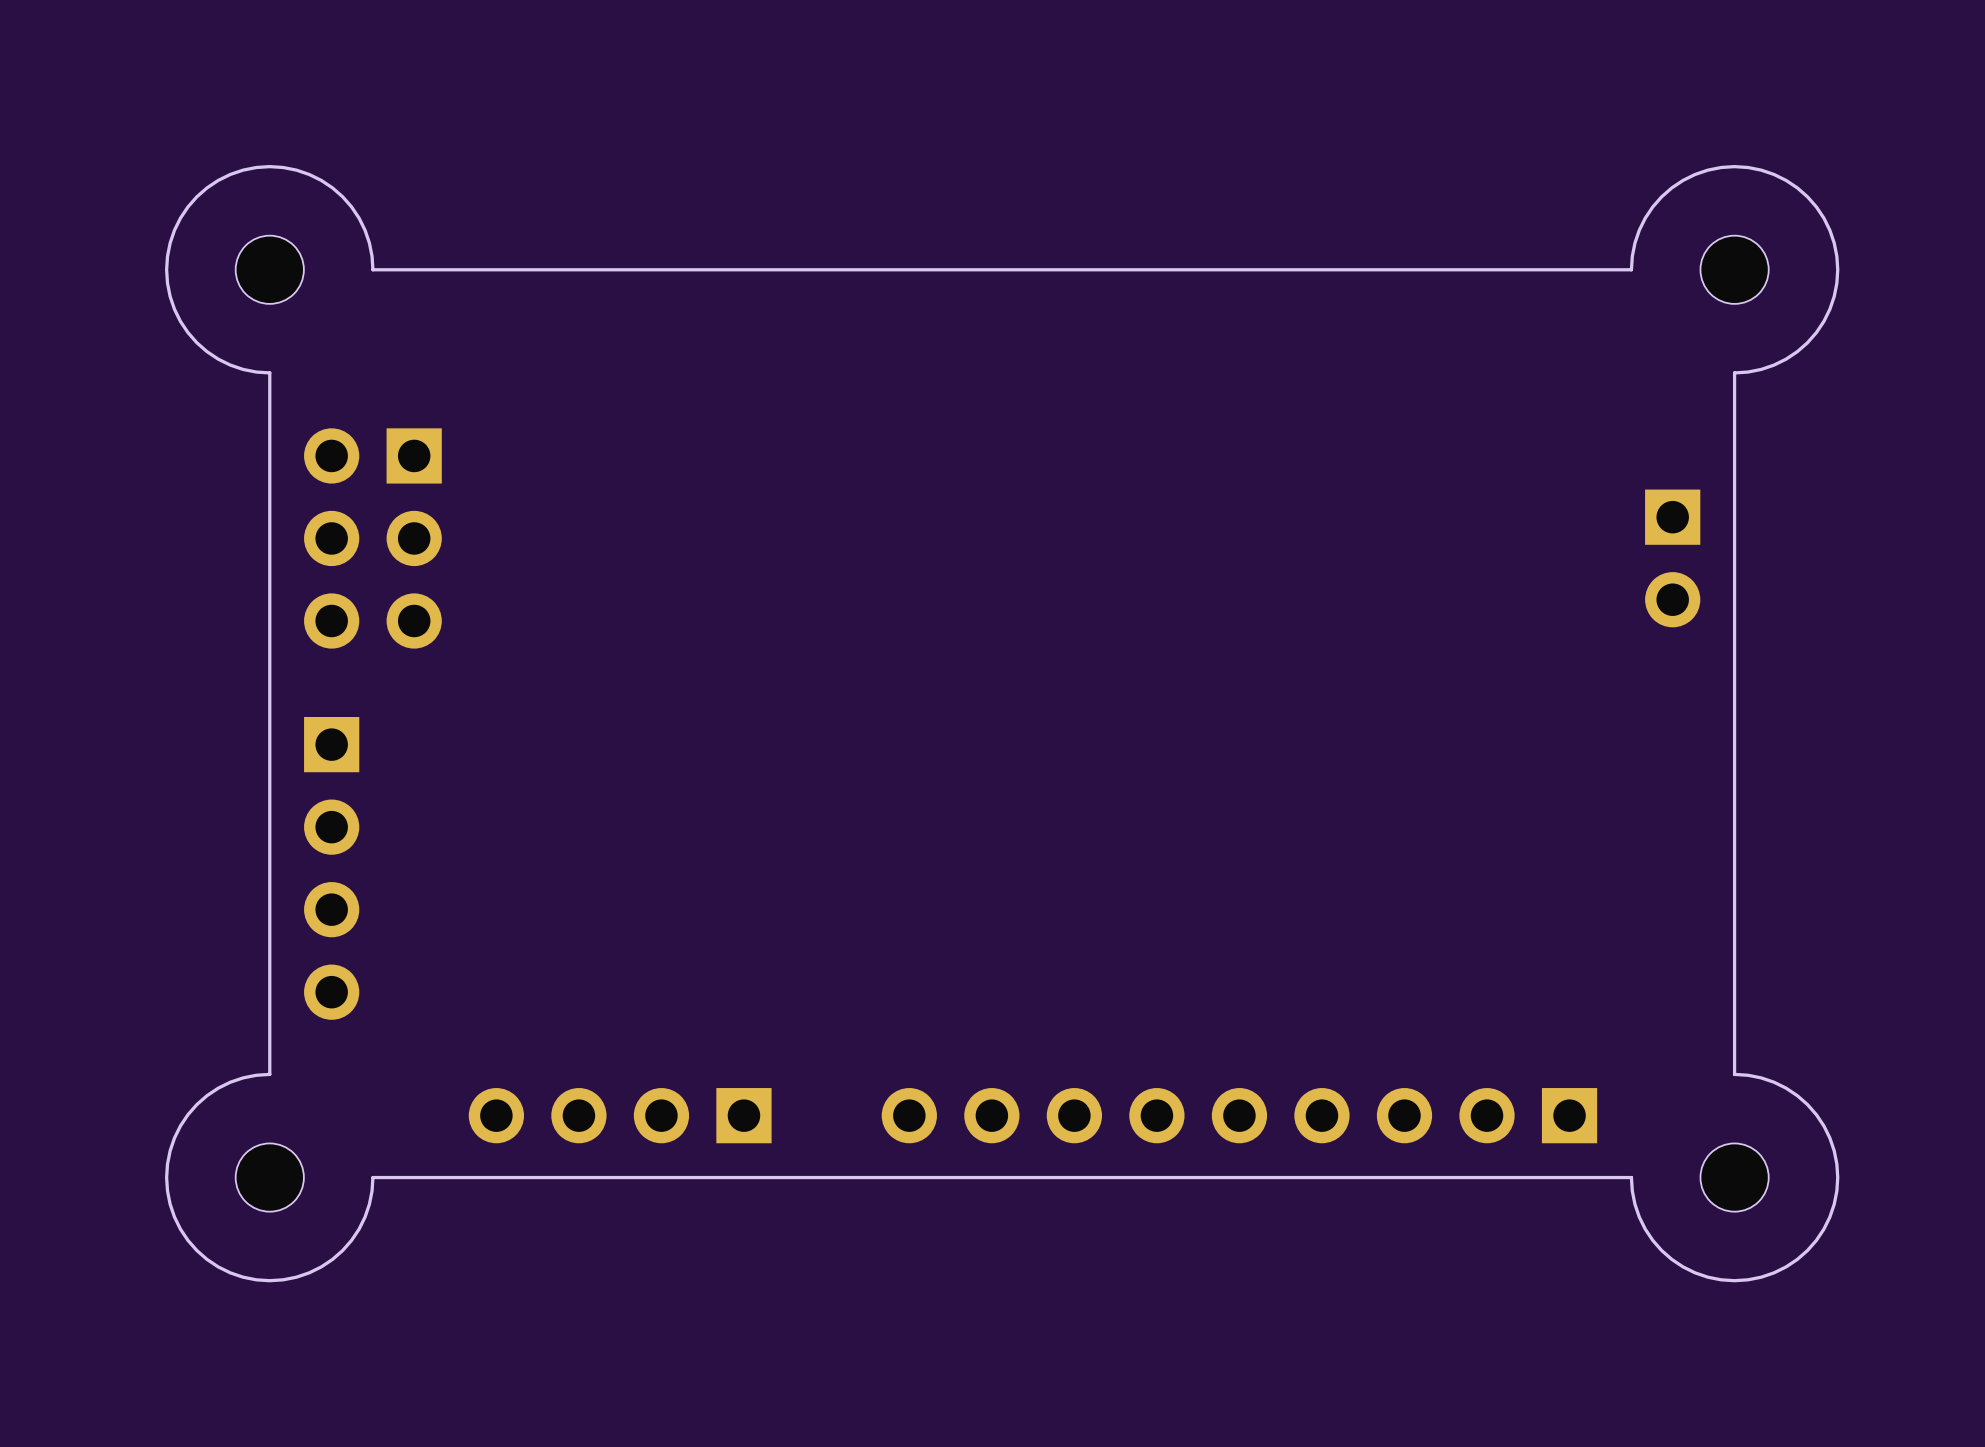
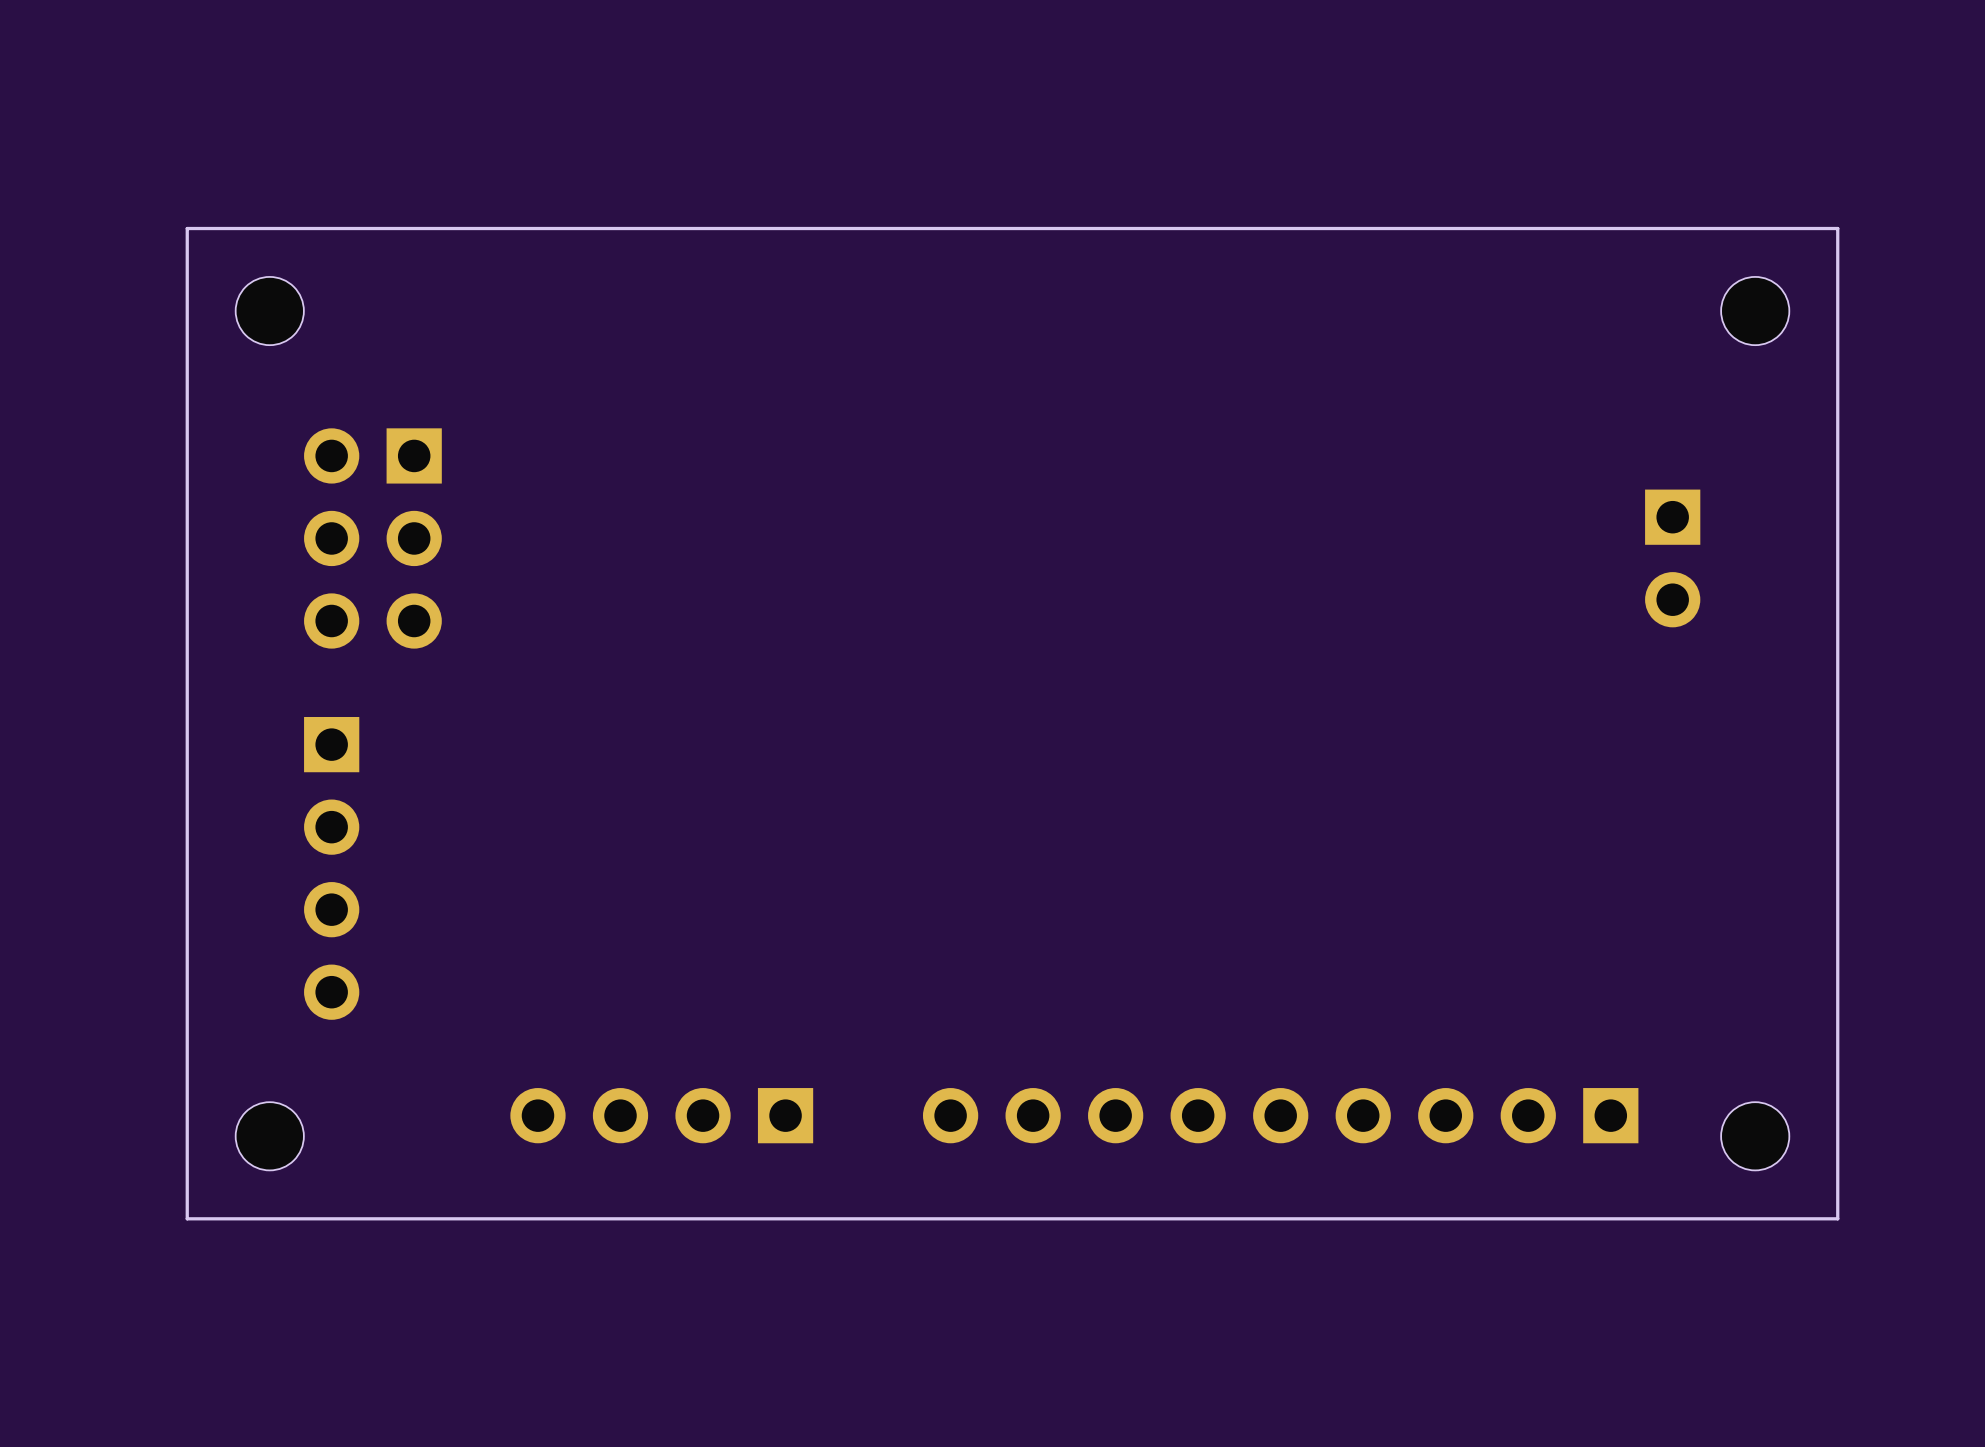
board edge: none -> (1837, 228) (187, 228) (187, 1218) (1837, 1218) (1837, 228)
part position: (269, 269) -> (269, 311)
part position: (1734, 269) -> (1755, 311)
board edge: (269, 372) (243, 369) (230, 365) (218, 359) (196, 342) (180, 321) (174, 309) (170, 296) (166, 269) (170, 243) (174, 230) (180, 218) (196, 196) (206, 187) (230, 174) (256, 167) (269, 166) (296, 170) (321, 180) (342, 196) (359, 218) (365, 230) (369, 243) (372, 269) (1631, 269) (1634, 243) (1639, 230) (1652, 206) (1661, 196) (1671, 187) (1695, 174) (1707, 170) (1734, 166) (1761, 170) (1774, 174) (1797, 187) (1816, 206) (1823, 218) (1834, 243) (1836, 256) (1837, 269) (1834, 296) (1829, 309) (1816, 332) (1797, 351) (1774, 365) (1761, 369) (1734, 372) (1734, 1074) (1761, 1077) (1774, 1082) (1797, 1095) (1807, 1104) (1816, 1114) (1829, 1138) (1834, 1150) (1837, 1177) (1834, 1204) (1823, 1229) (1807, 1250) (1786, 1266) (1761, 1277) (1734, 1280) (1707, 1277) (1683, 1266) (1661, 1250) (1645, 1229) (1634, 1204) (1631, 1177) (372, 1177) -> none
board edge: (269, 372) (269, 1074) (243, 1077) (230, 1082) (206, 1095) (187, 1114) (174, 1138) (170, 1150) (166, 1177) (167, 1191) (174, 1217) (180, 1229) (187, 1240) (206, 1259) (218, 1266) (243, 1277) (269, 1280) (296, 1277) (309, 1272) (332, 1259) (342, 1250) (359, 1229) (365, 1217) (369, 1204) (372, 1177) -> none
part position: (620, 1115) -> (661, 1115)
part position: (1239, 1115) -> (1280, 1115)
part position: (269, 1177) -> (269, 1136)
part position: (1734, 1177) -> (1755, 1136)

